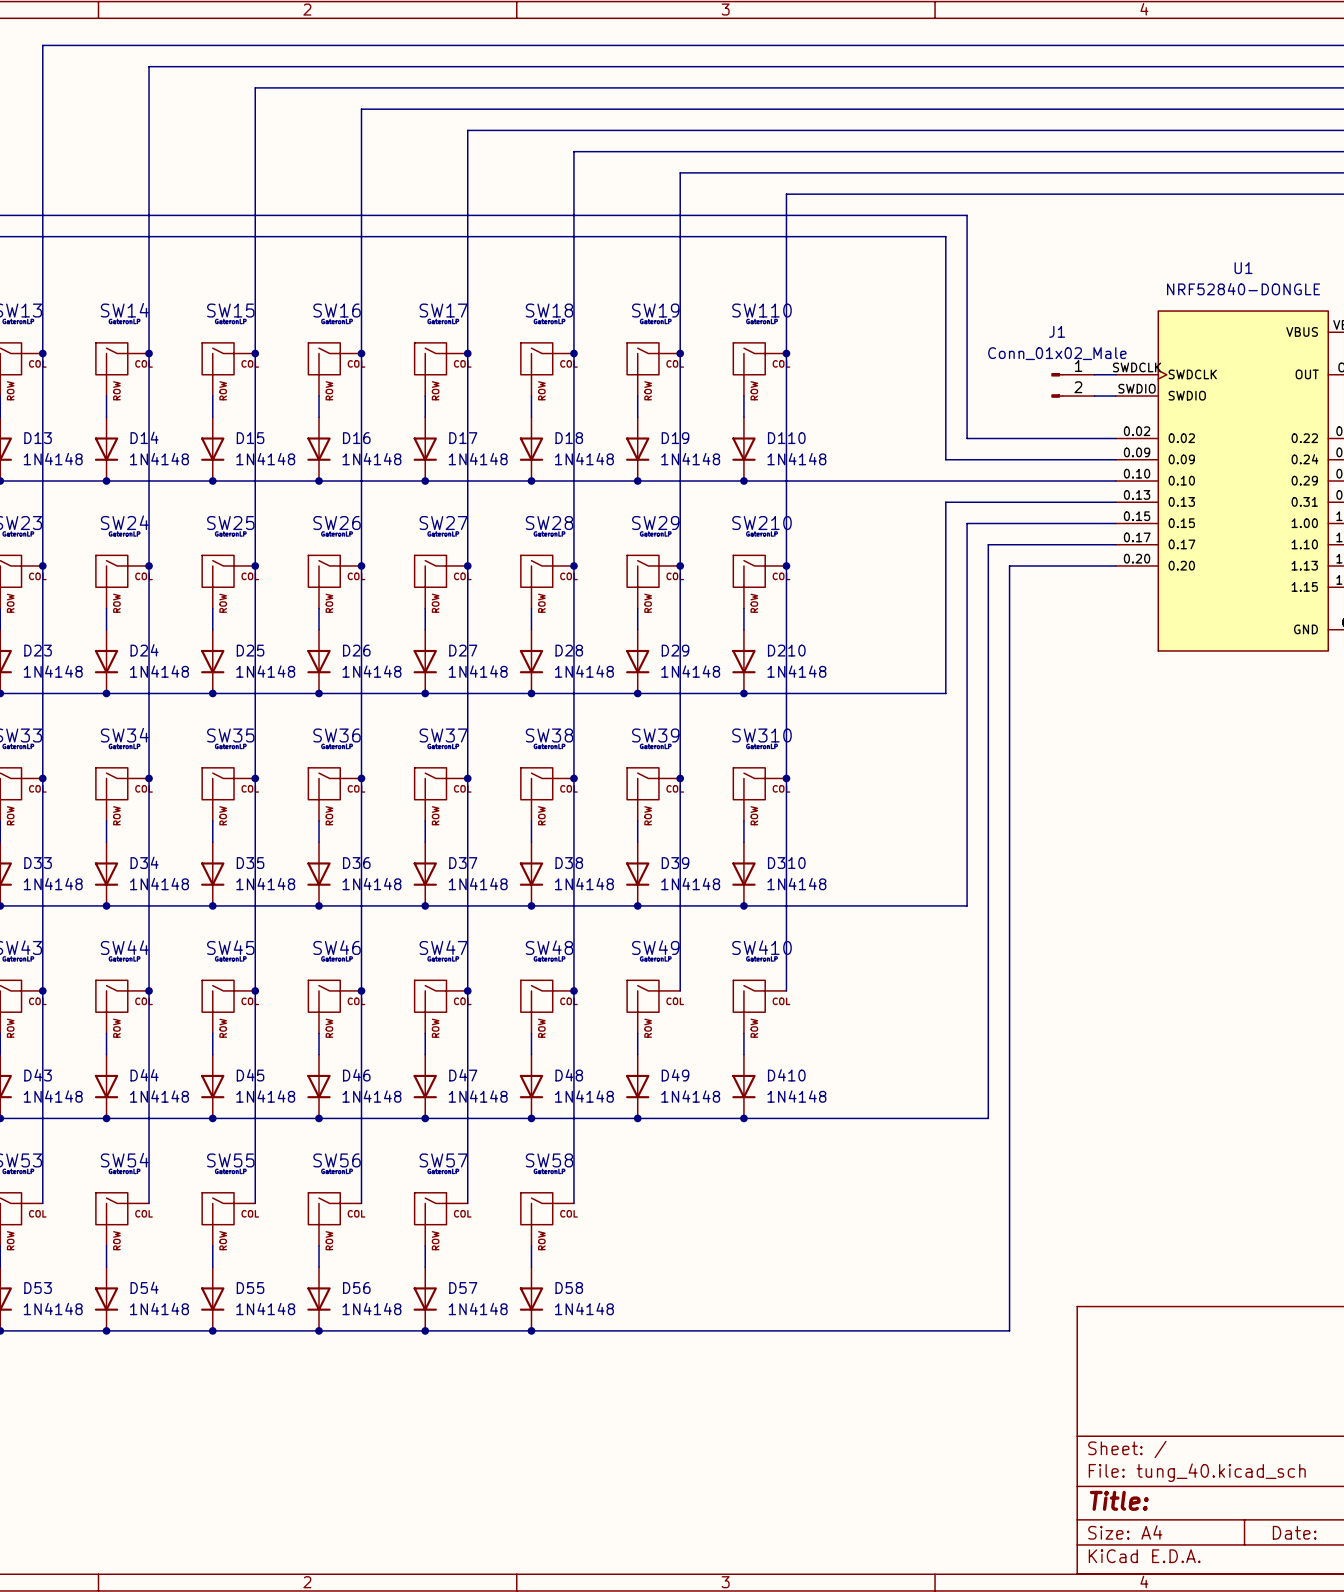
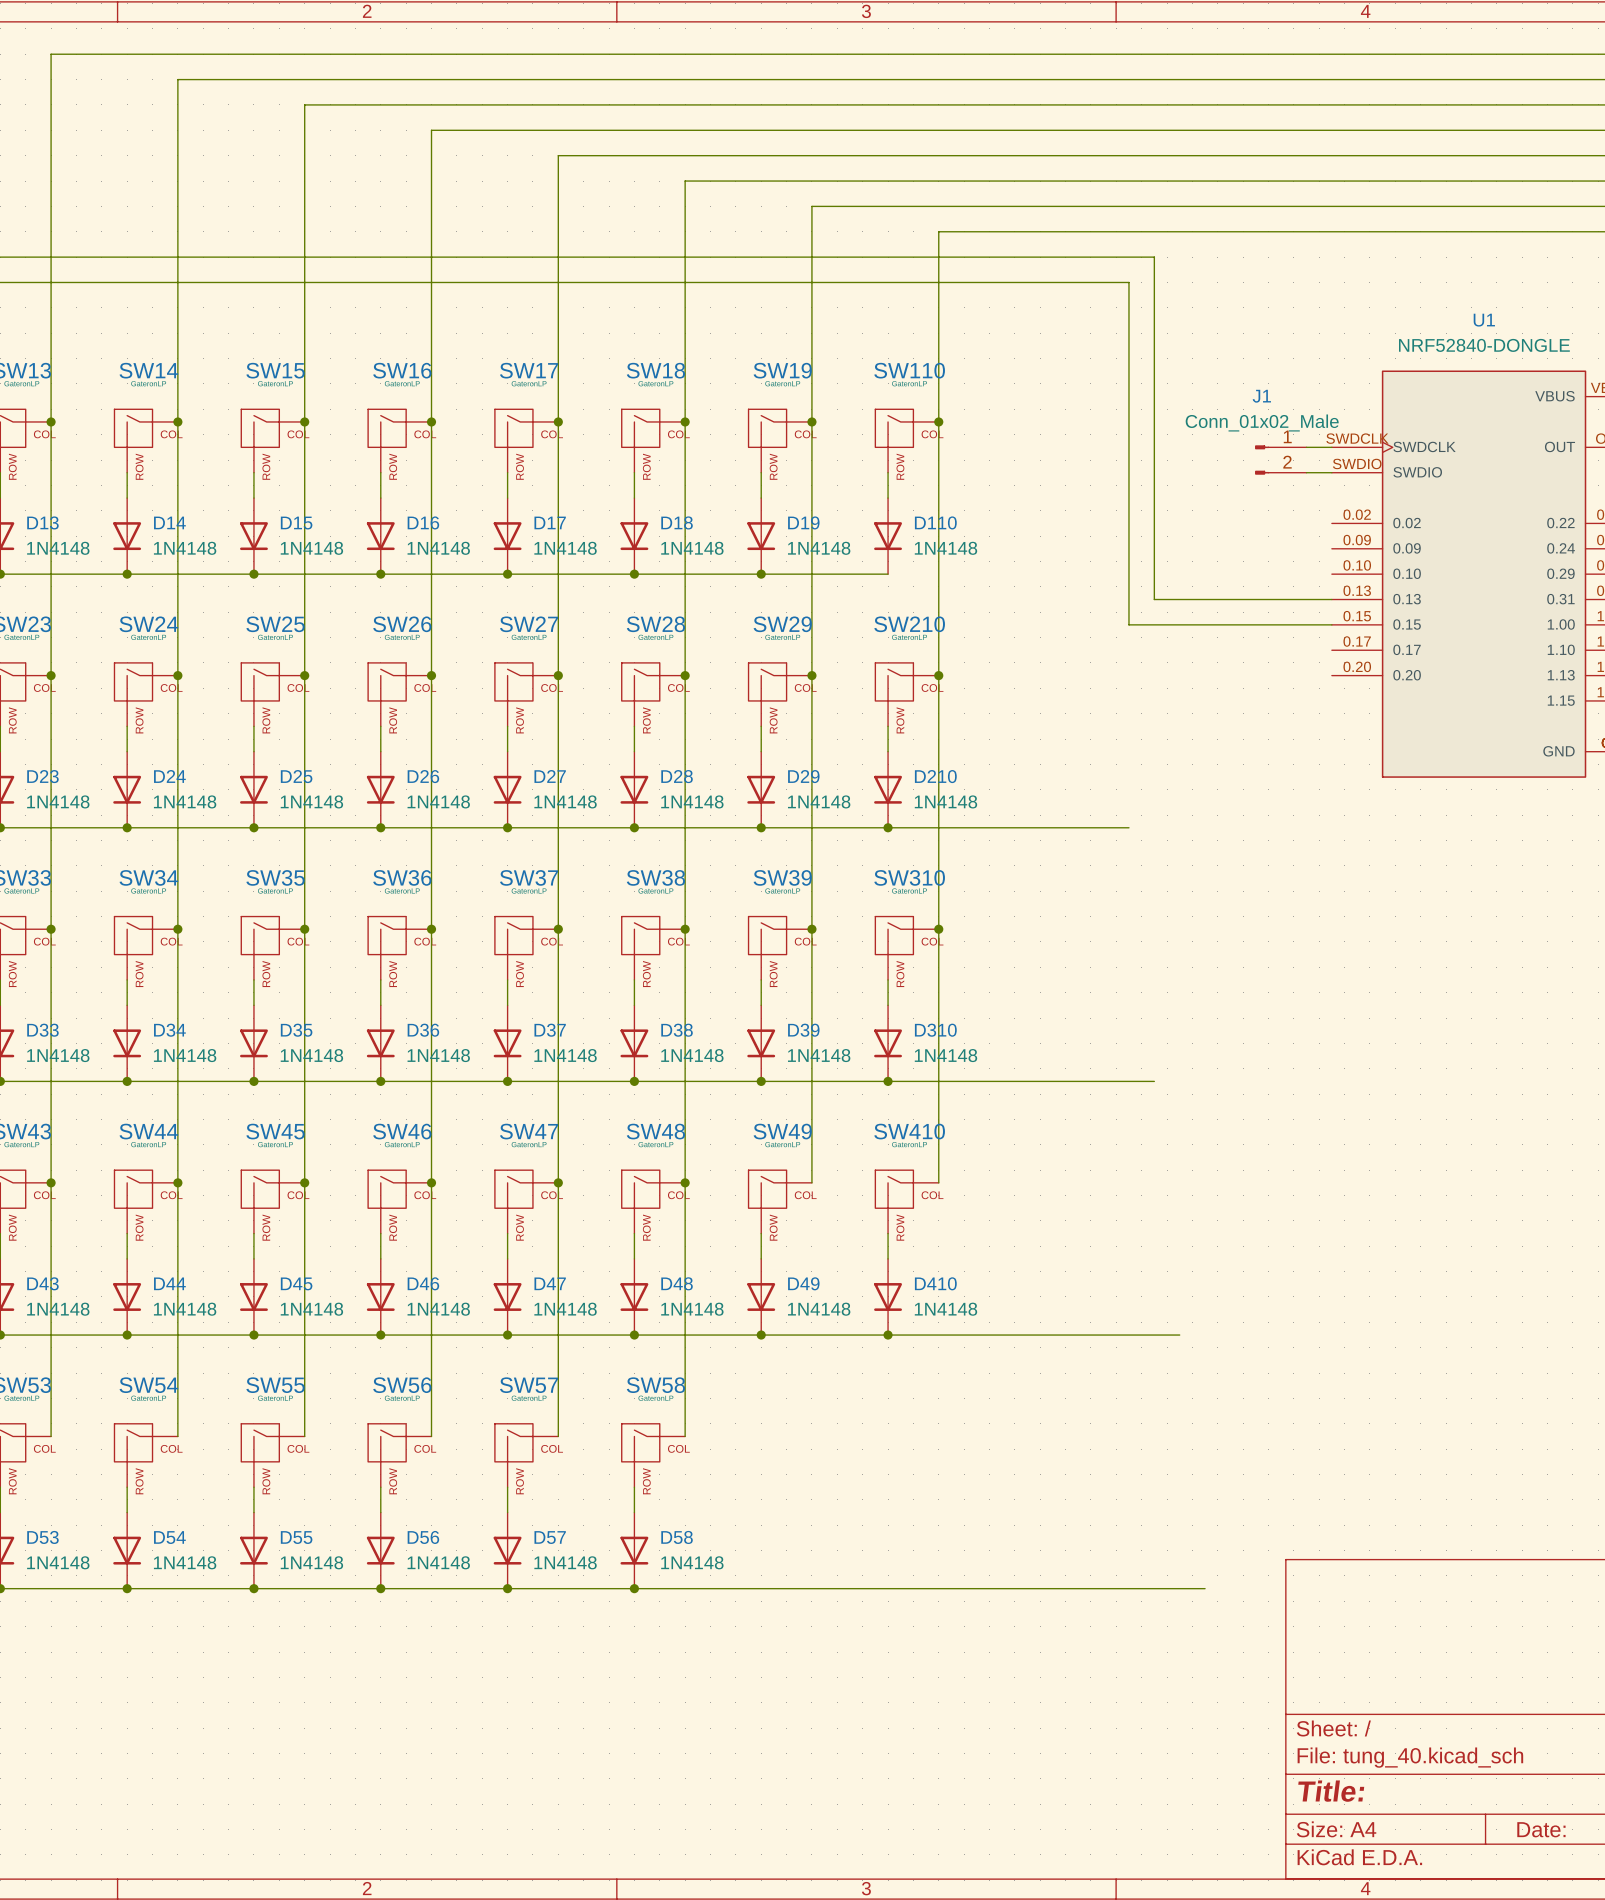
wire: (967, 438) (1115, 438) -> (1154, 523) (1154, 599)
wire: (945, 459) (1115, 459) -> none
wire: (743, 481) (1115, 481) -> none
junction: (743, 481) -> none
wire: (945, 502) (967, 502) -> (1128, 599) (1128, 548)
wire: (945, 523) (945, 693) -> (1128, 624) (1154, 624)
wire: (967, 523) (967, 905) -> none
wire: (1115, 544) (988, 544) (988, 1118) -> none
wire: (1115, 565) (1009, 565) (1009, 1330) -> none

